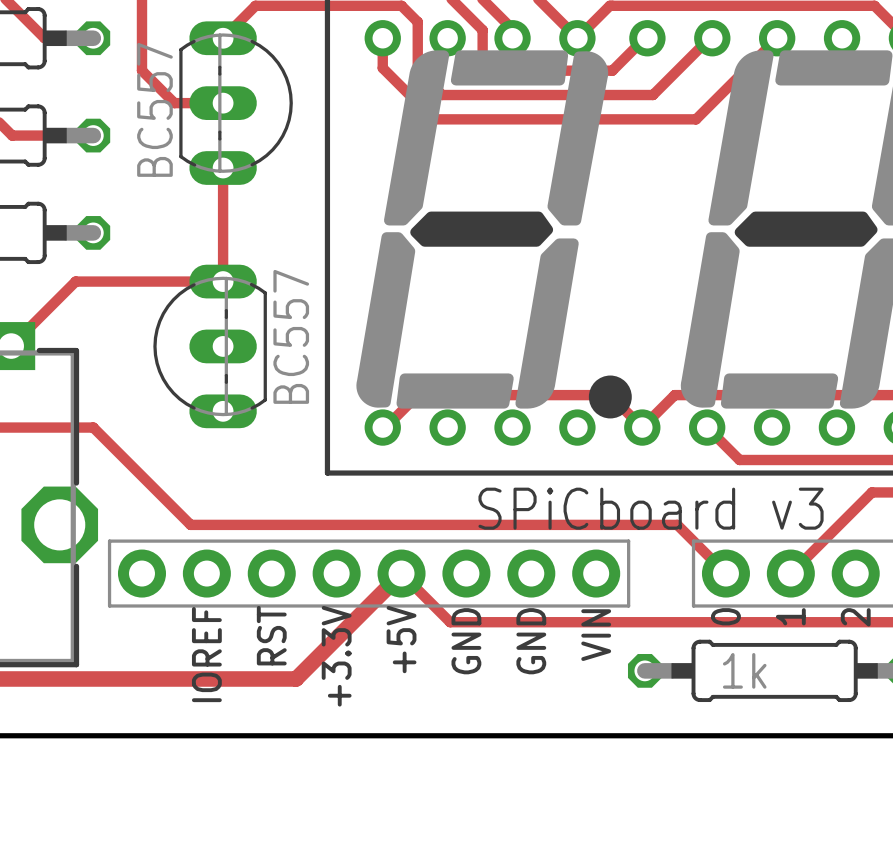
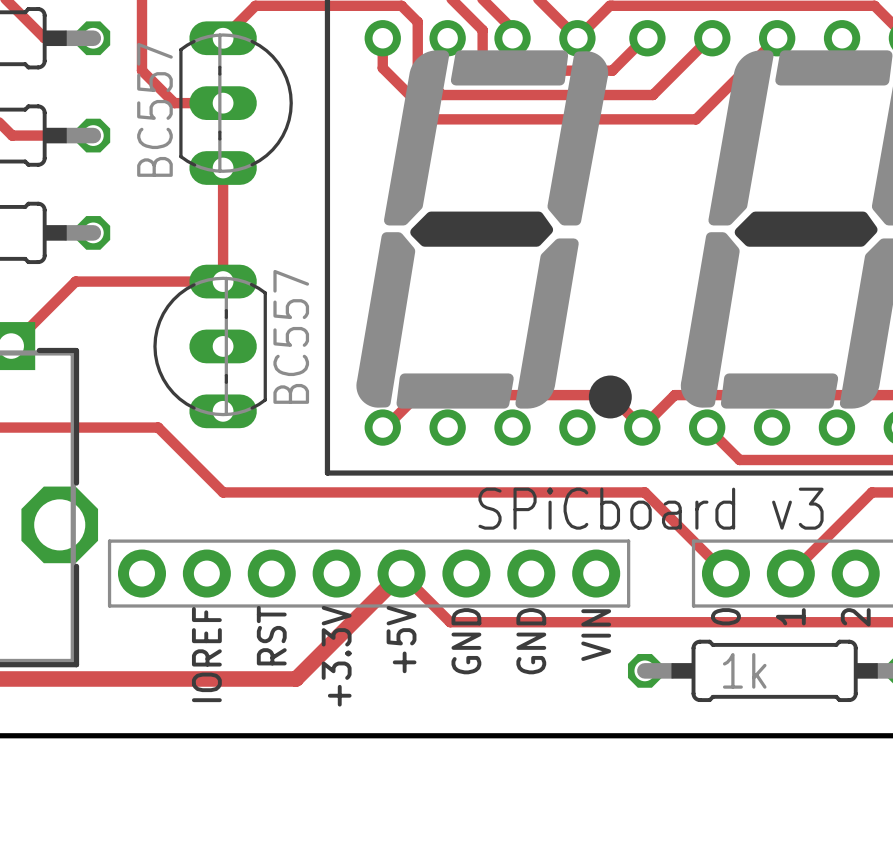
track: (93, 427) (190, 524) (677, 524) -> (93, 427) (158, 427) (223, 492) (644, 492) (677, 524)

